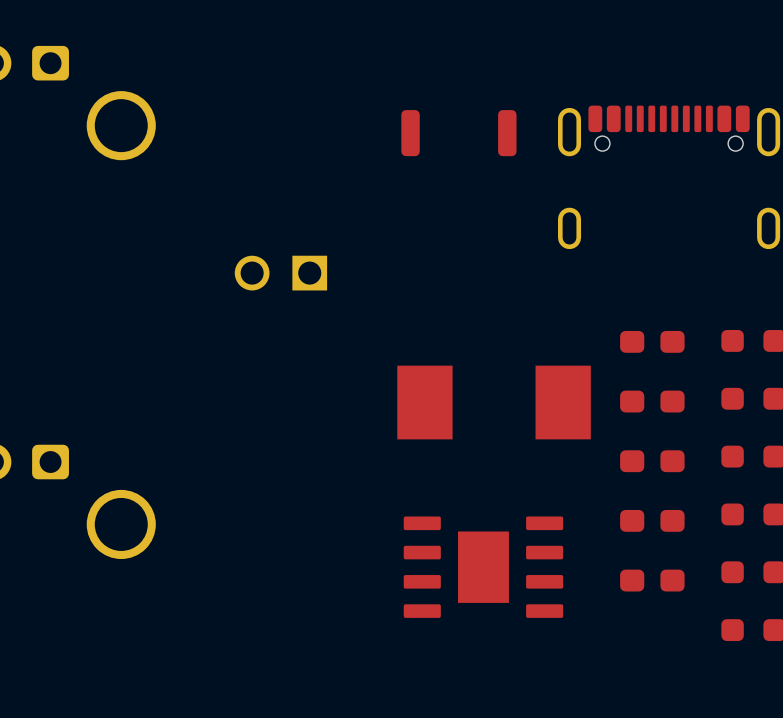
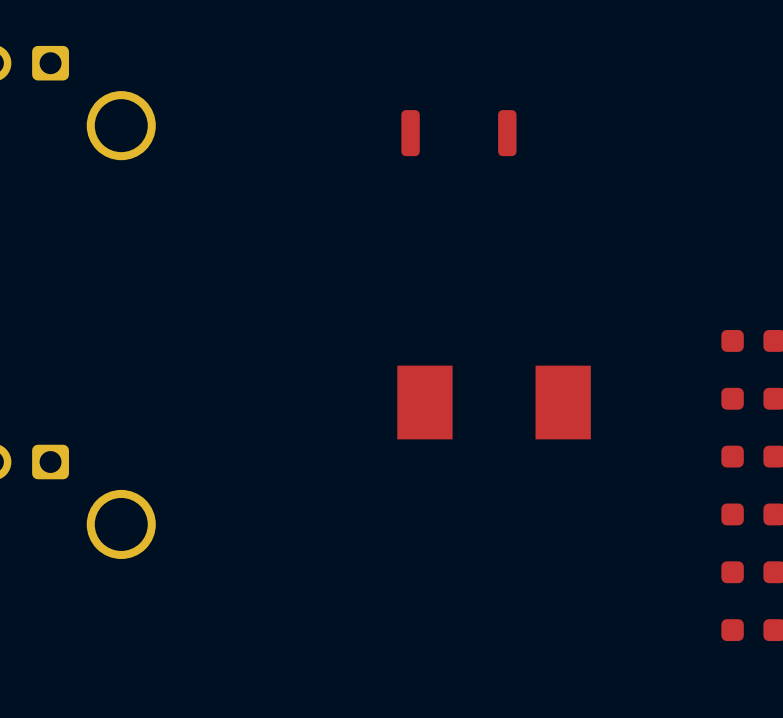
part: (669, 177) -> none
part: (280, 273) -> none
part: (652, 341) -> none
part: (652, 401) -> none
part: (652, 461) -> none
part: (652, 520) -> none
part: (483, 567) -> none
part: (652, 580) -> none

